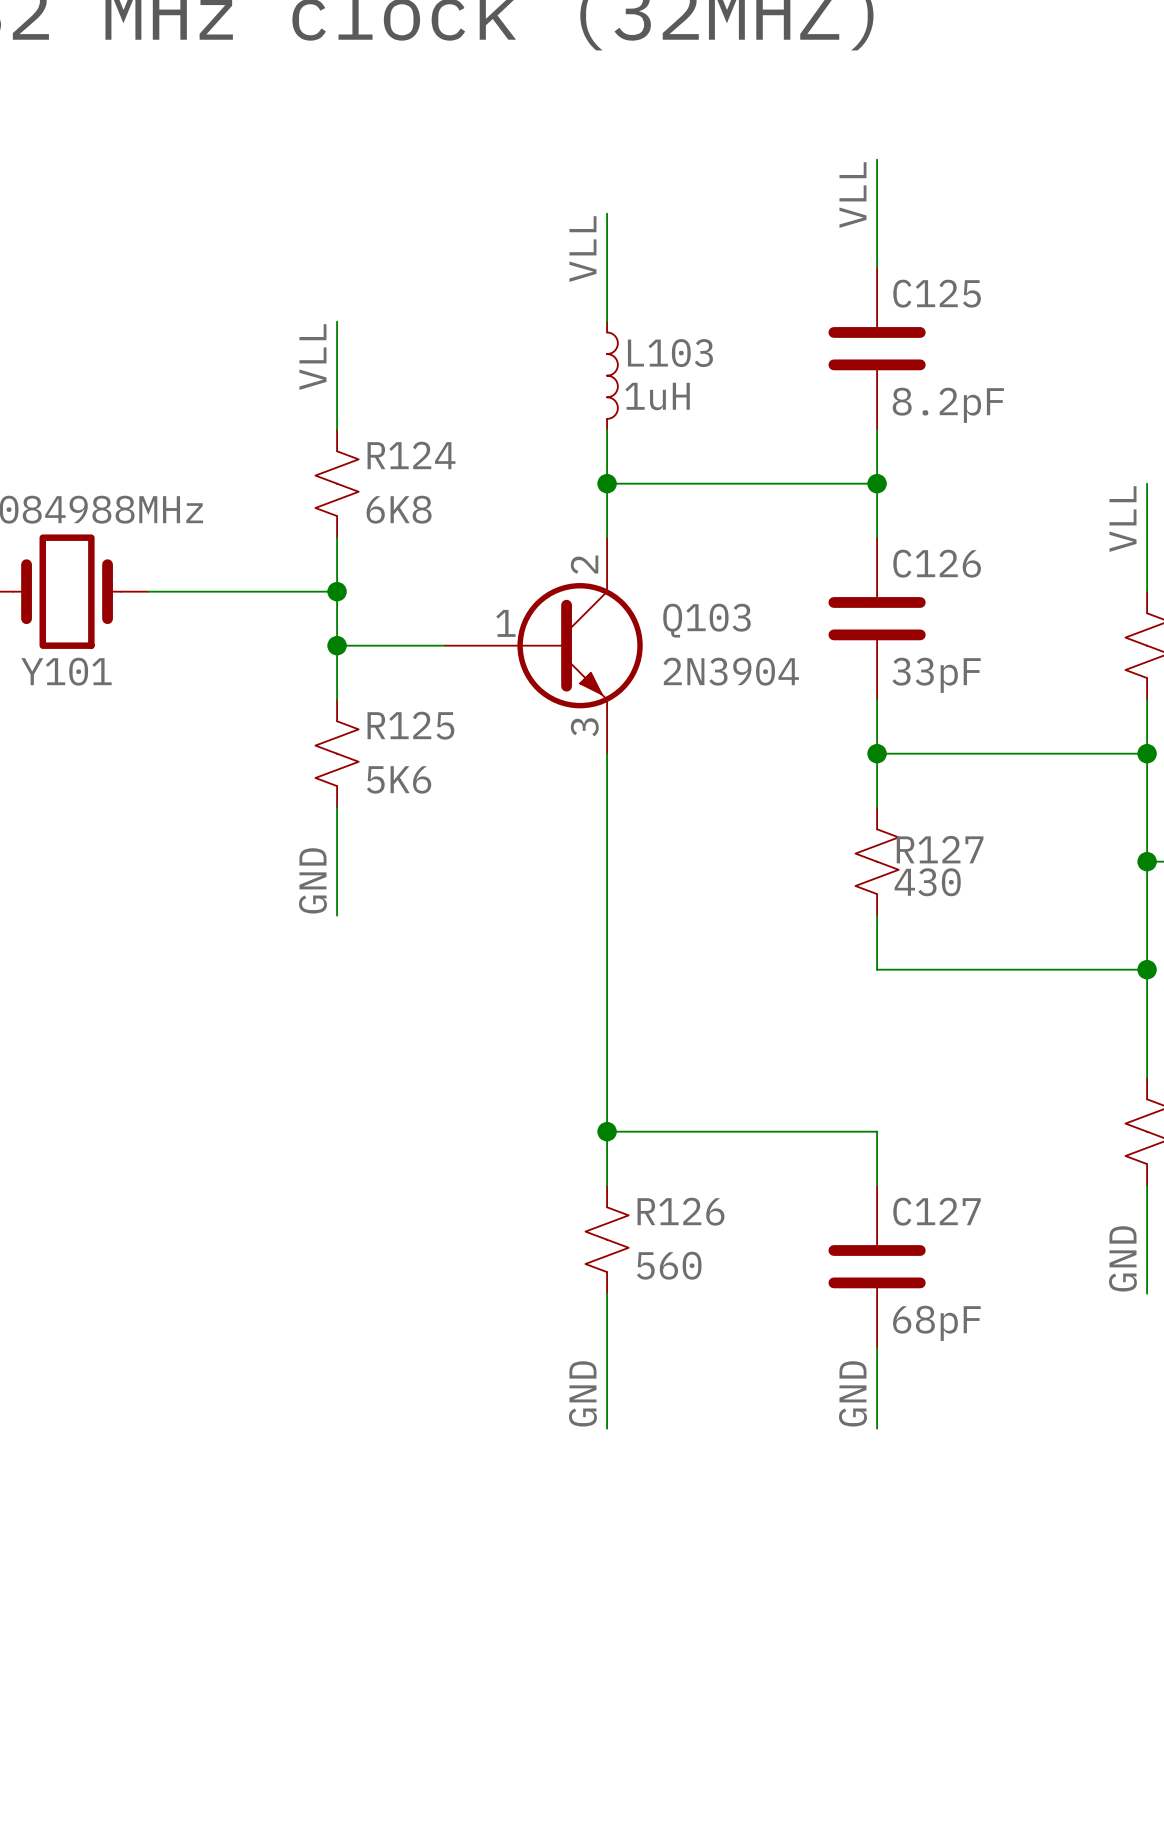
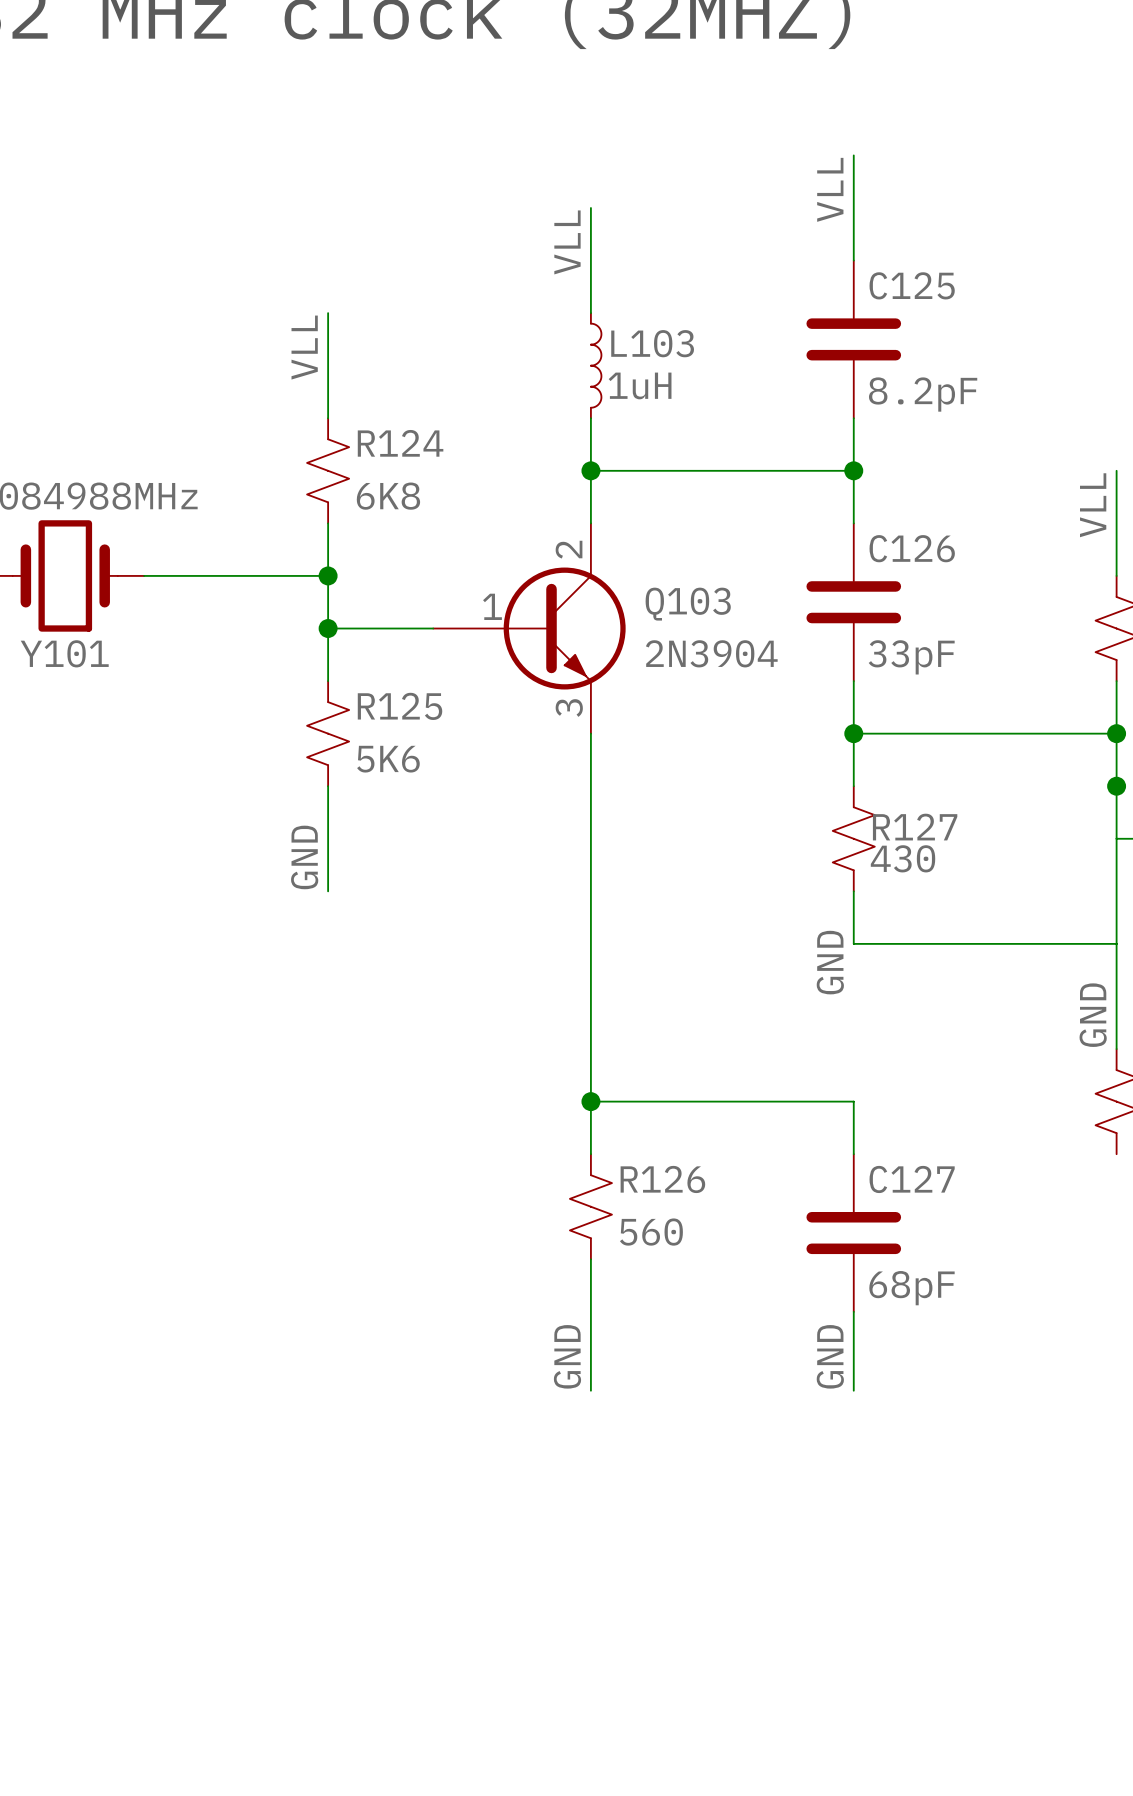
junction position: (1147, 861) -> (1116, 786)
junction: (1147, 969) -> none
label: none -> GND (830, 962)
label: none -> GND (1093, 1015)
wire: (1147, 1185) (1147, 1293) -> none
label: GND (1122, 1258) -> none

